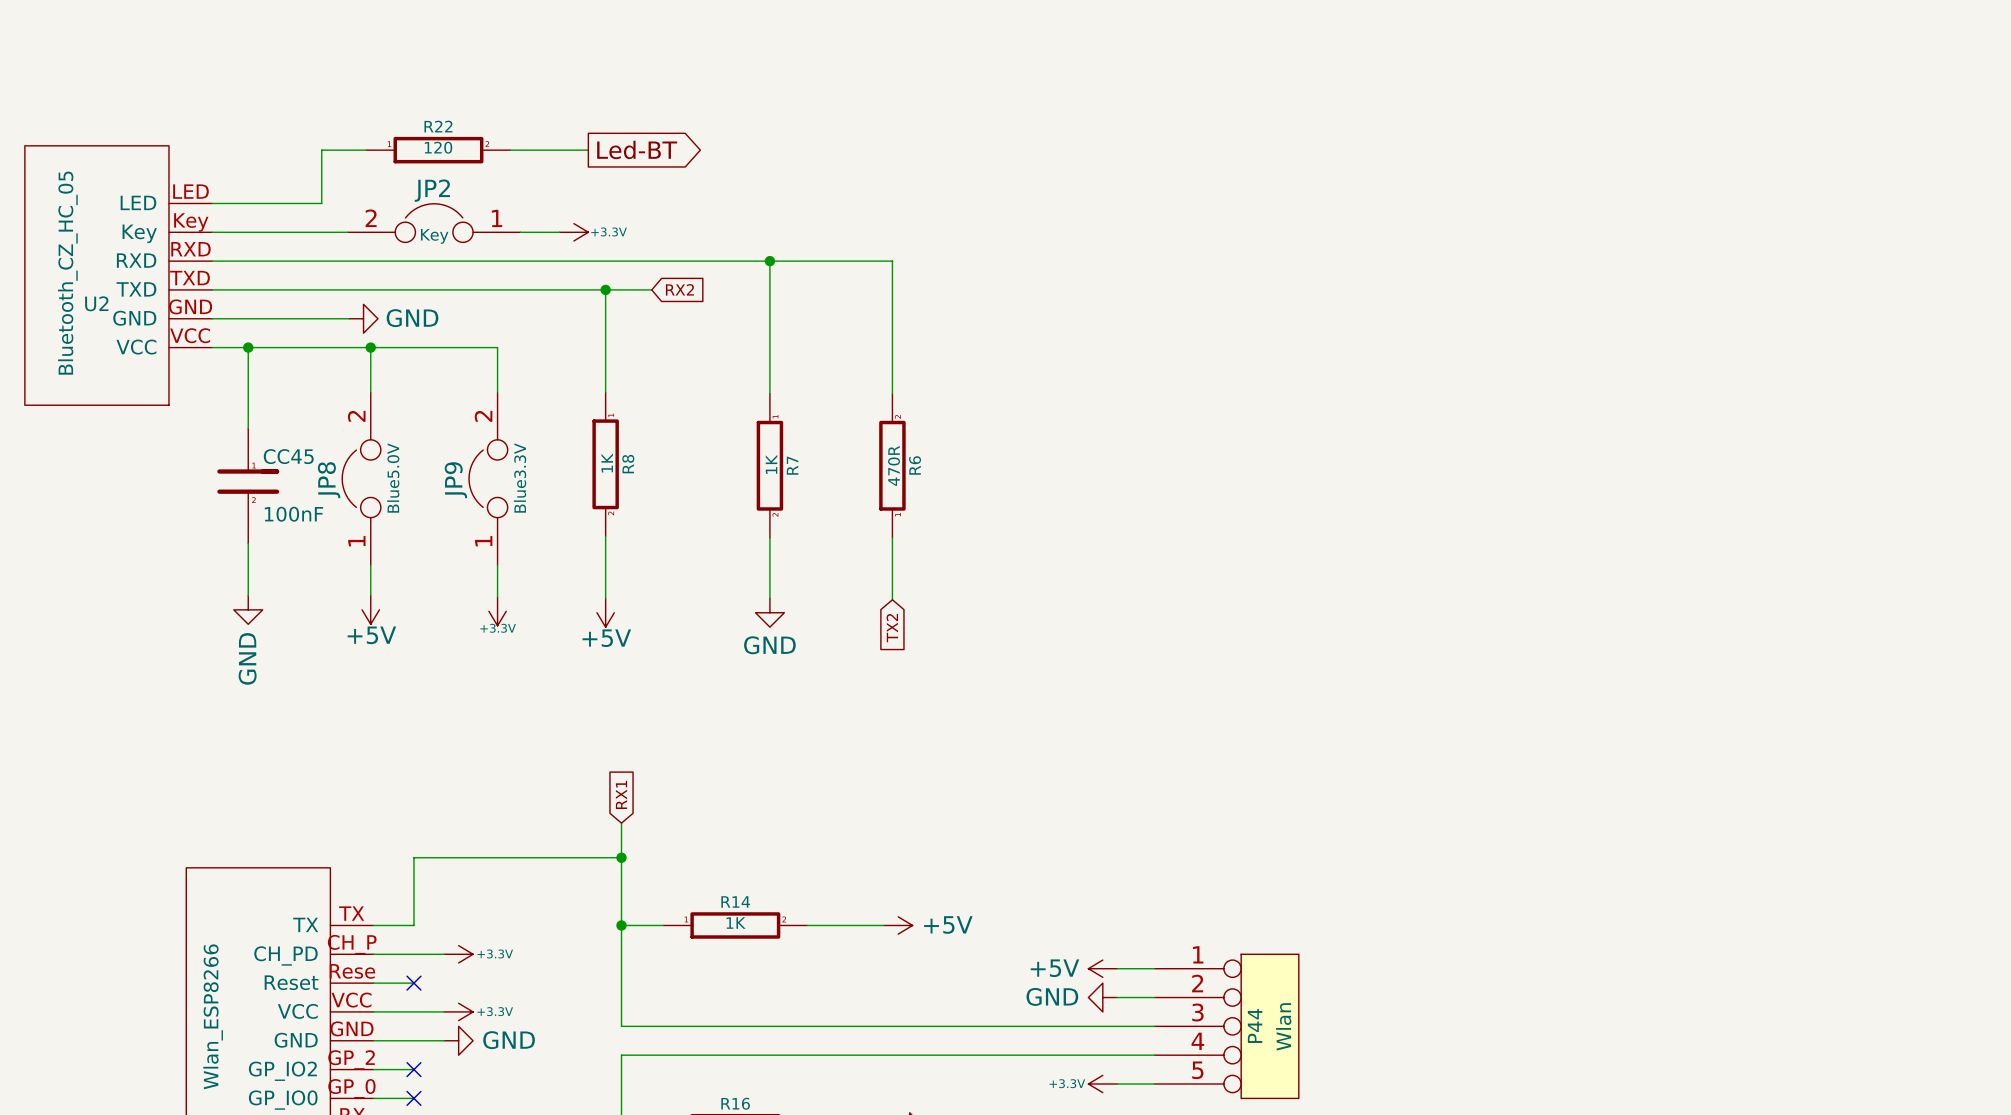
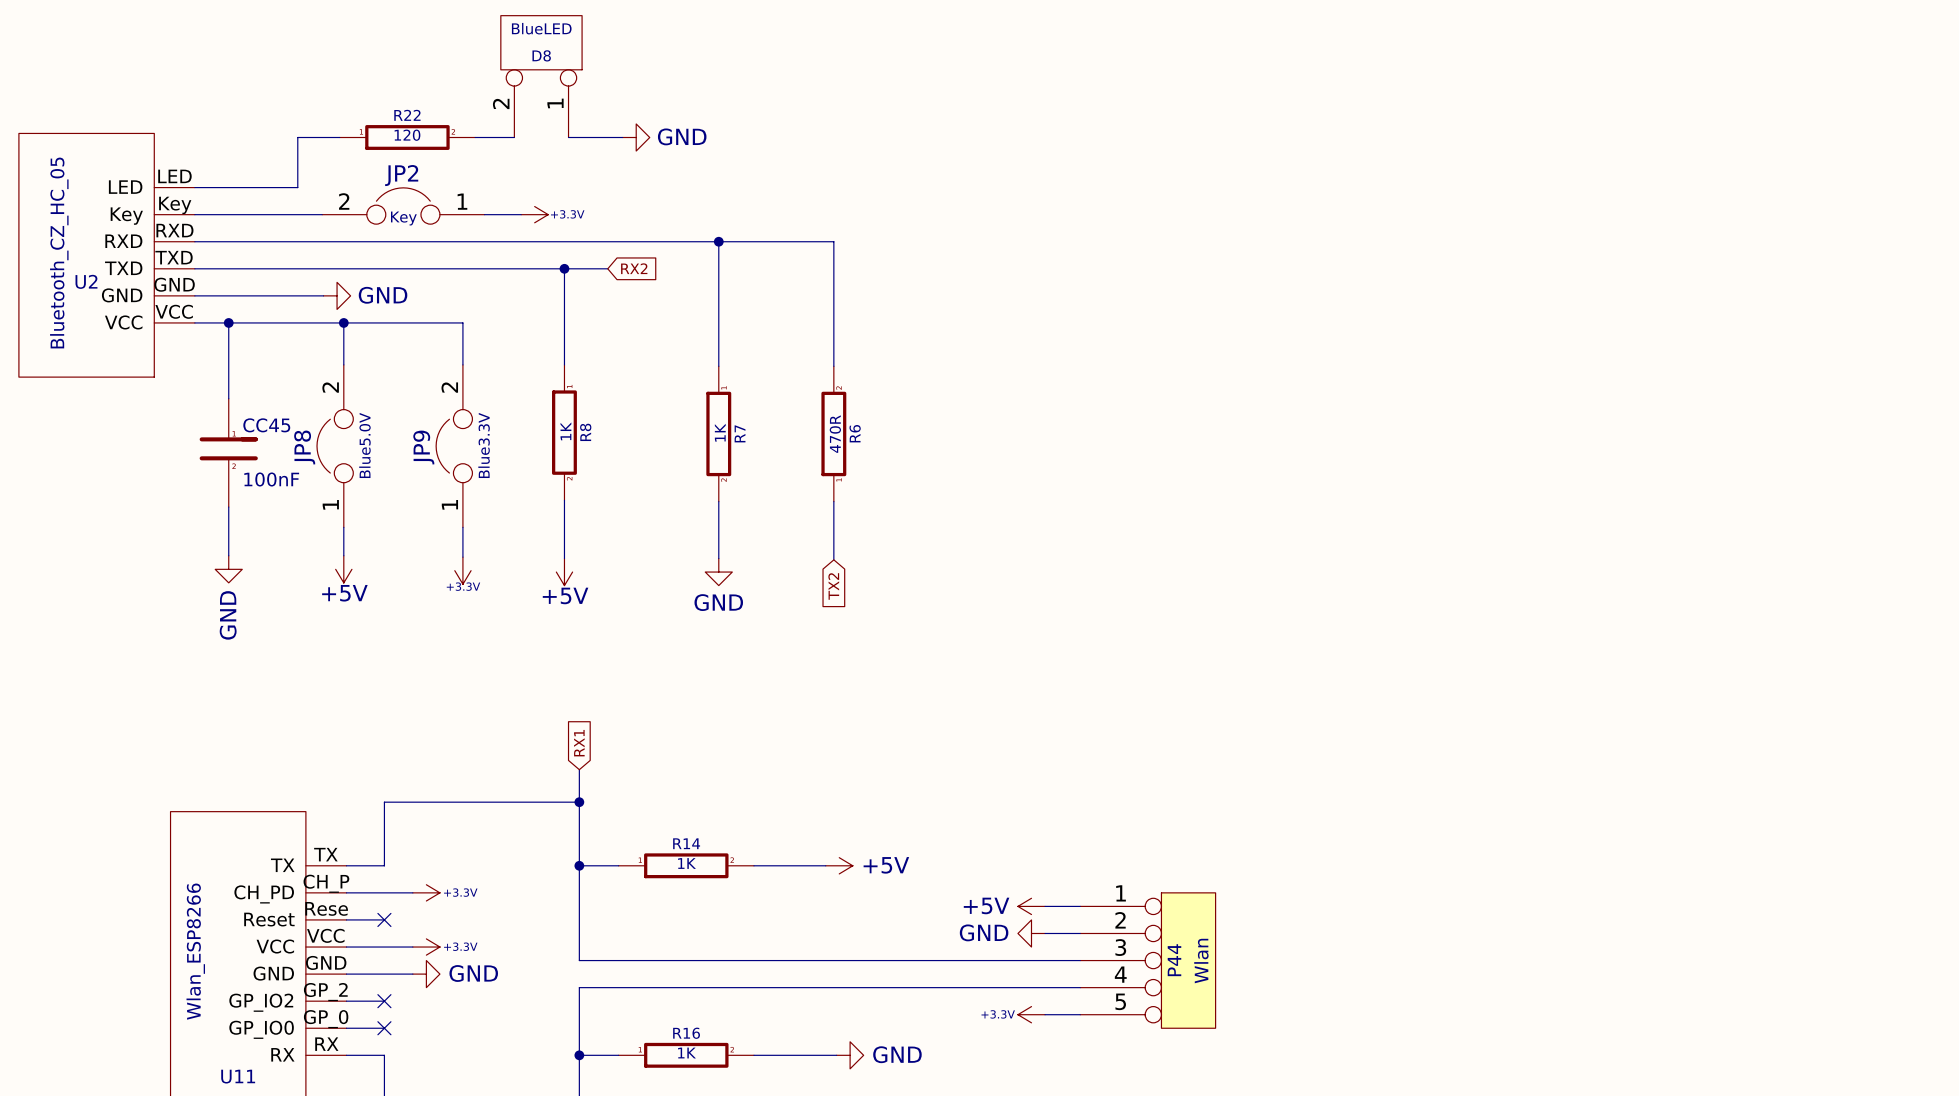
D8: none -> BlueLED (541, 76)
global label: Led-BT (637, 149) -> none
wire: (552, 150) (588, 150) -> none
wire: none -> (568, 137) (622, 137)
power symbol: none -> GND (636, 137)

